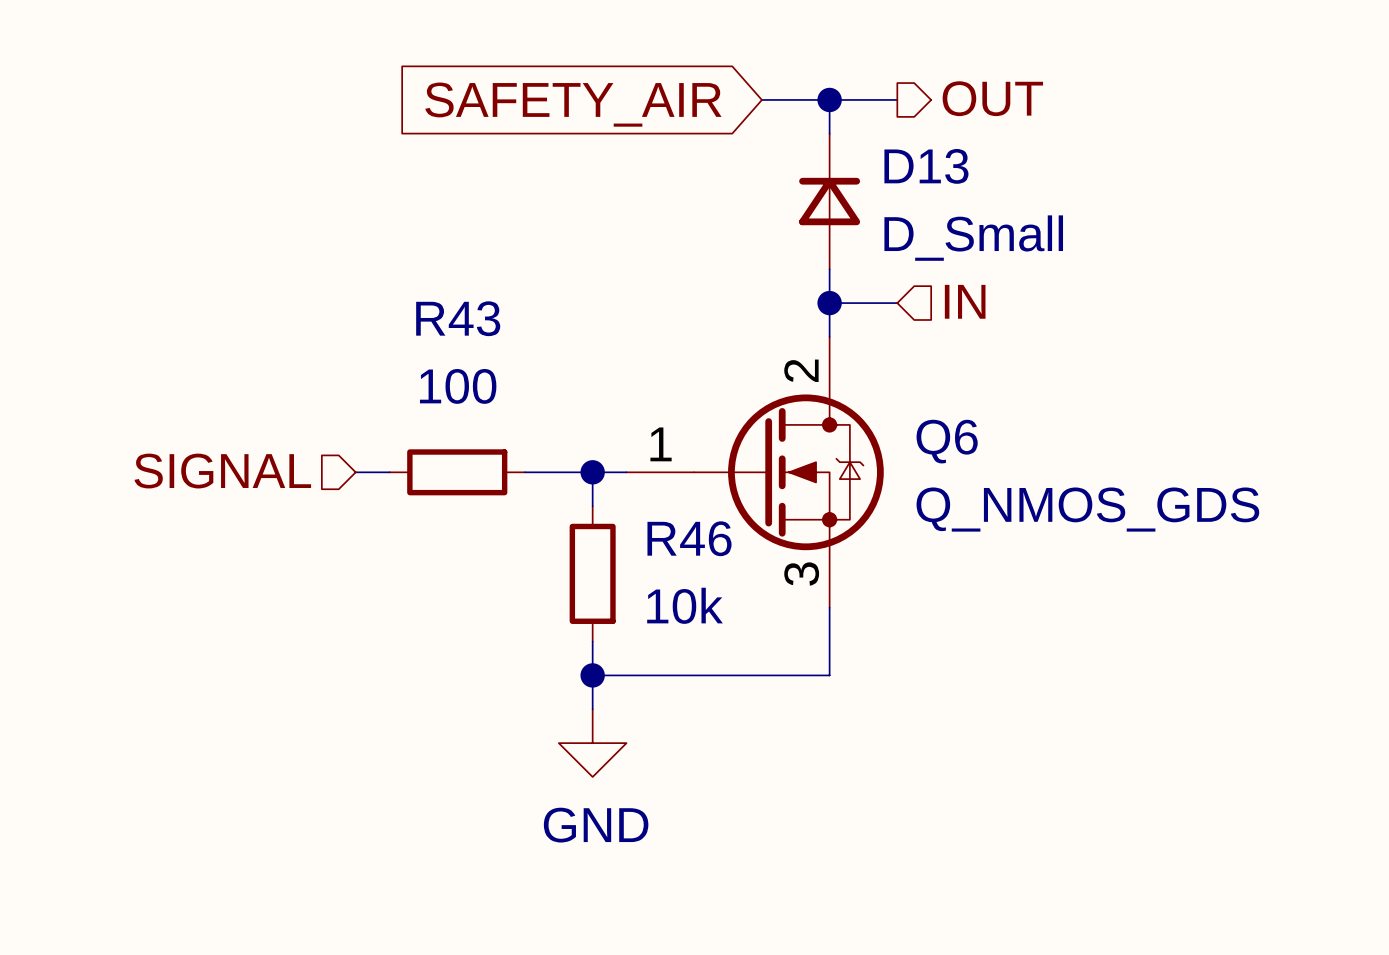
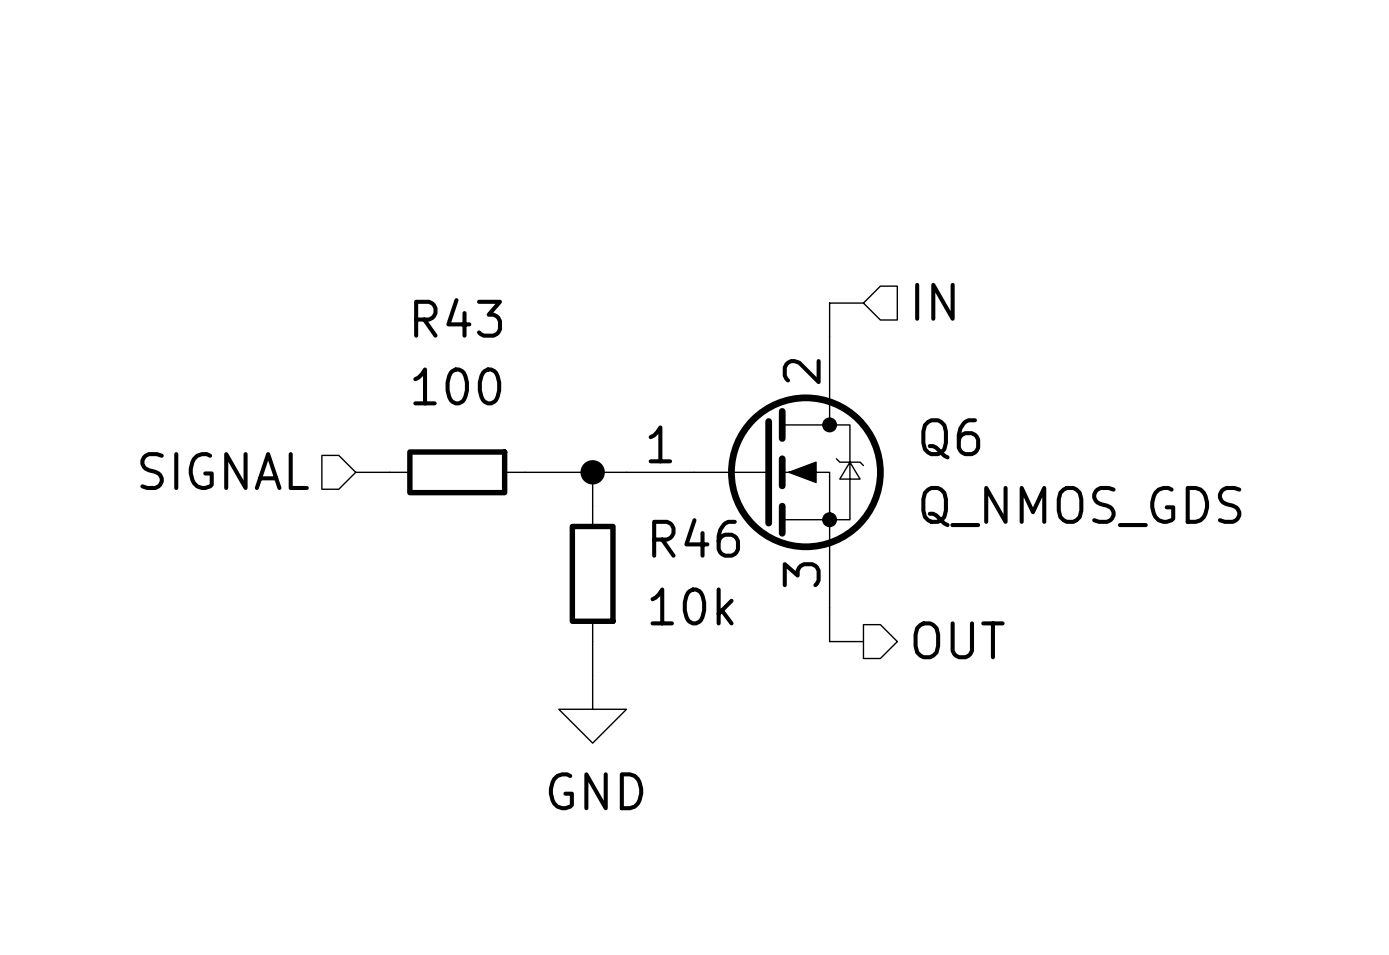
hierarchical label position: OUT (992, 98) -> OUT (959, 640)
wire: (761, 99) (897, 99) -> none
wire: (829, 99) (829, 133) -> none
junction: (829, 99) -> none
global label: SAFETY_AIR (573, 104) -> none
D13: D_Small (829, 201) -> none
wire: (829, 269) (829, 303) -> none
hierarchical label position: IN (965, 301) -> IN (934, 301)
junction: (829, 303) -> none
wire: (863, 303) (897, 303) -> none
wire: (829, 641) (829, 675) (592, 675) (592, 709) -> (829, 641) (863, 641)
junction: (592, 675) -> none
power symbol position: GND (592, 743) -> GND (592, 709)

